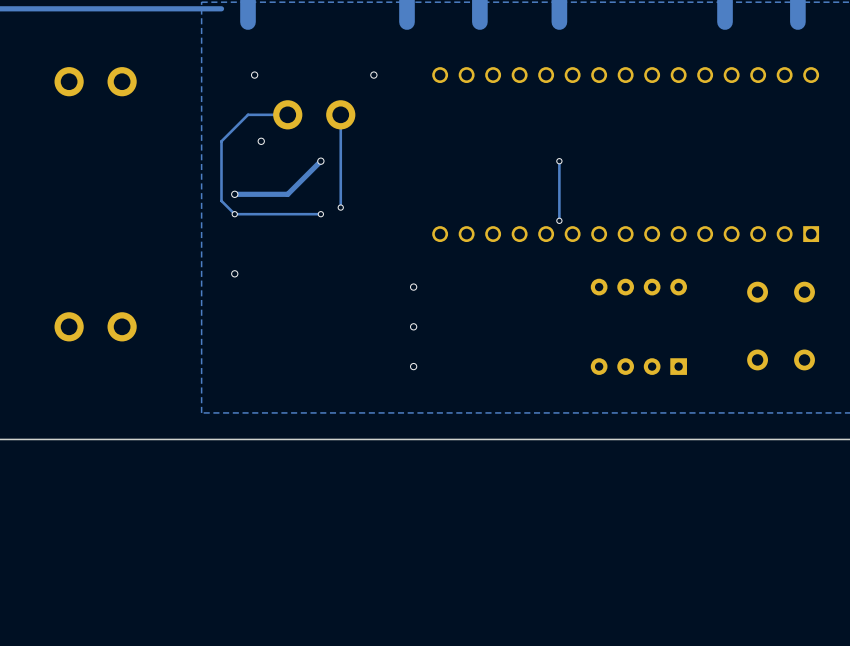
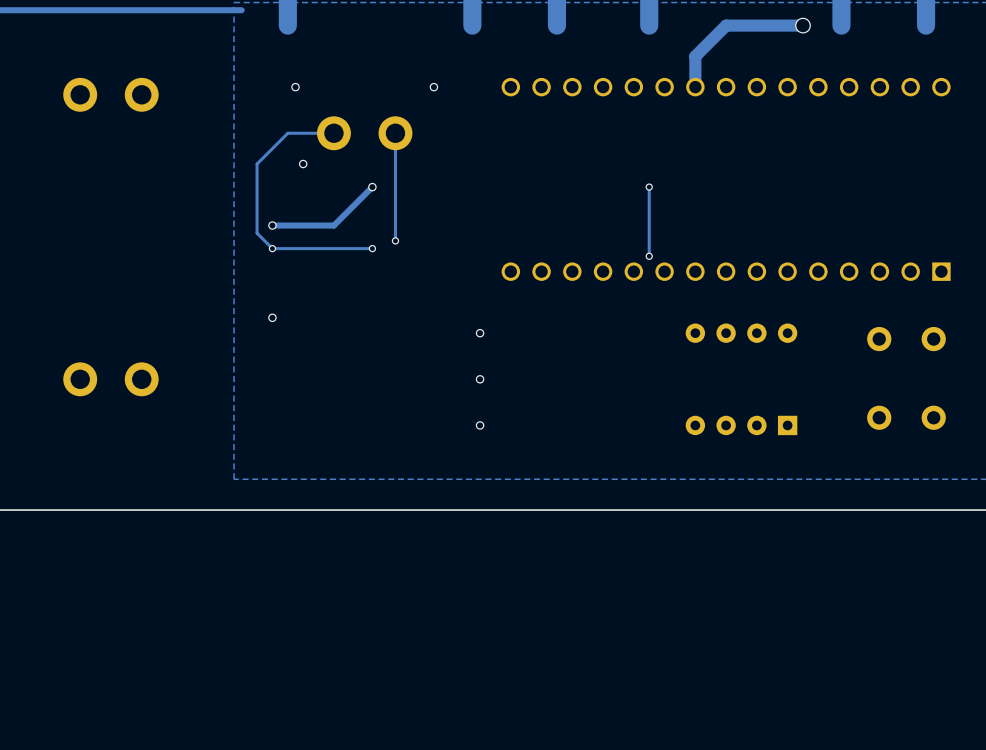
track: (221, 8) (208, 8) -> none
track: none -> (803, 25) (726, 25) (695, 56) (695, 87)
via: none -> (803, 25)

